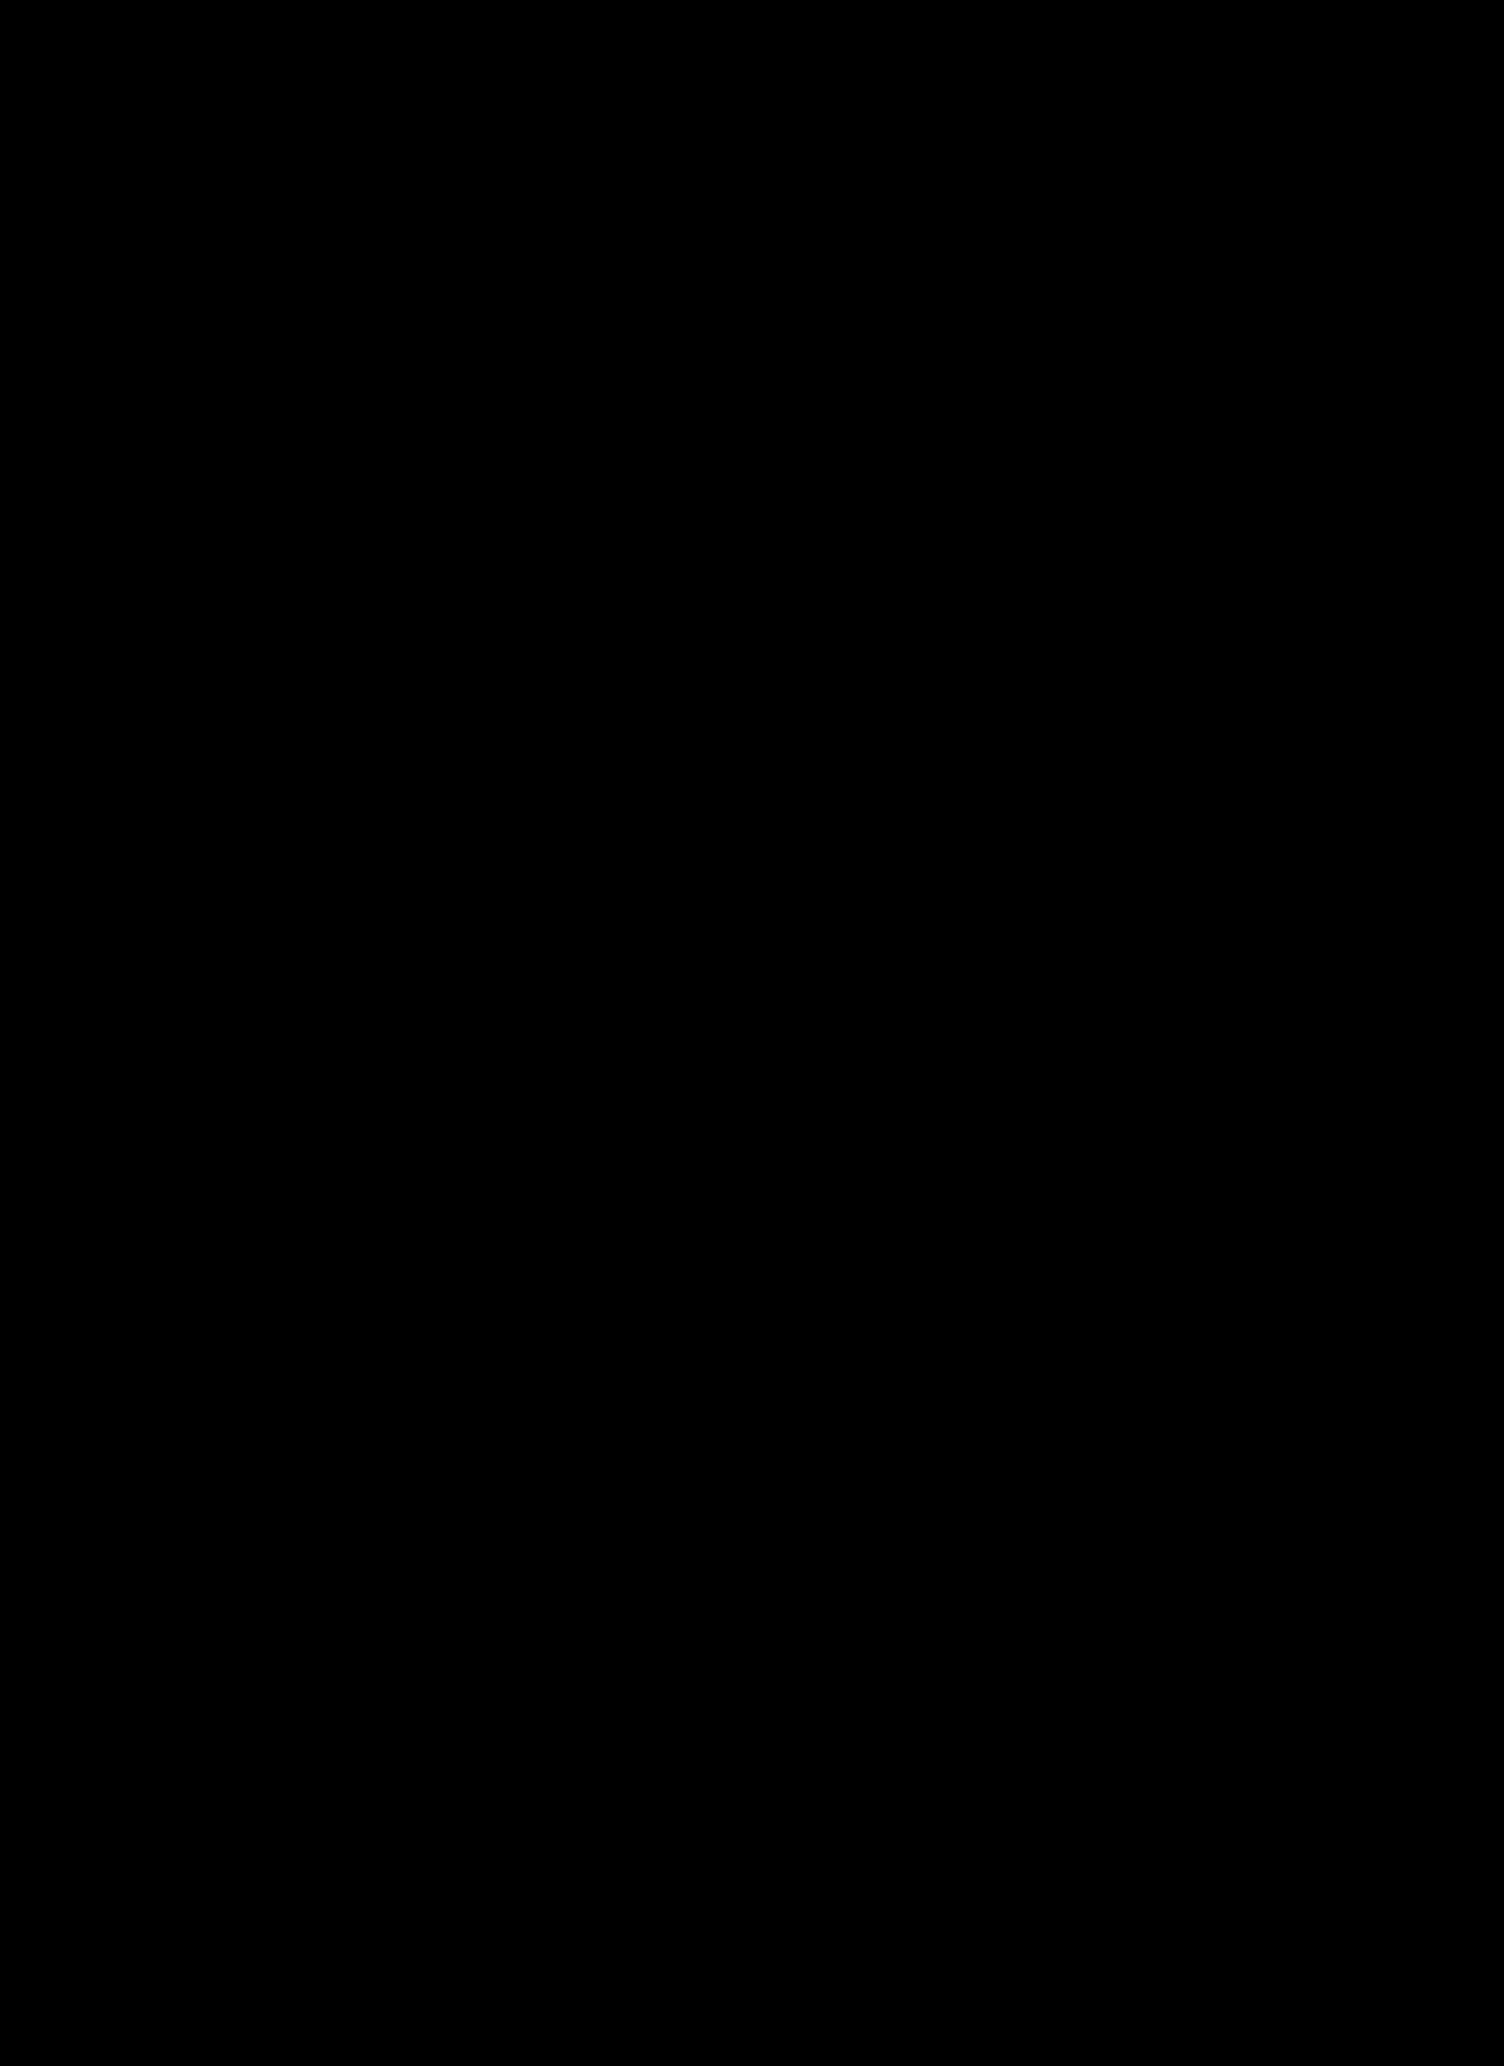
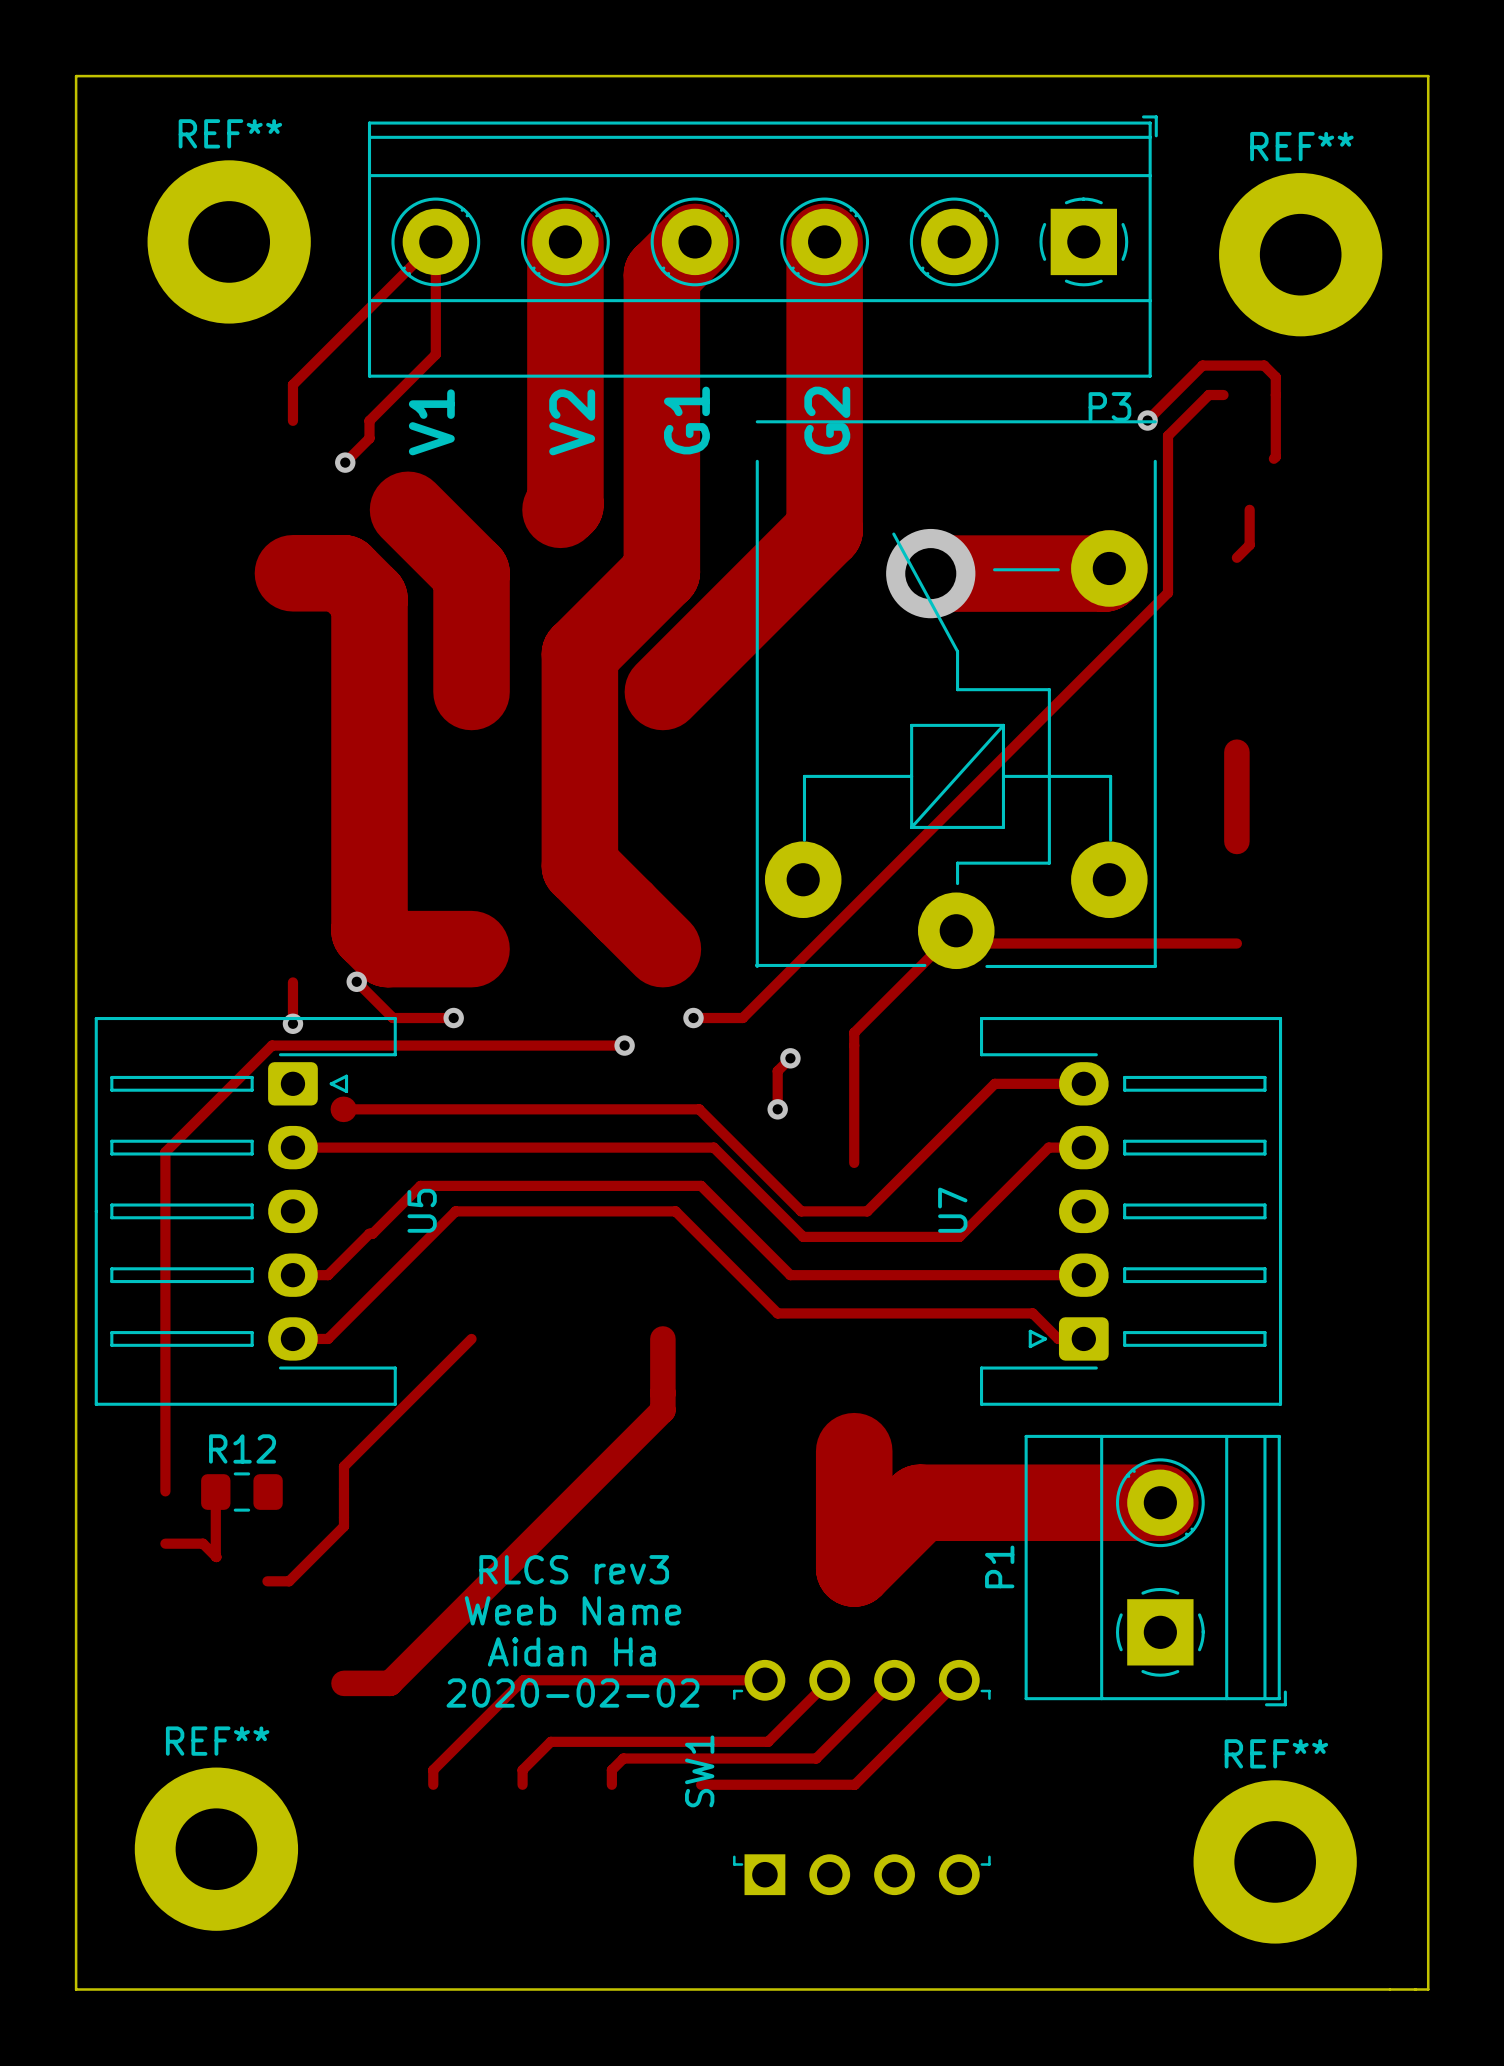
board edge: none -> (76, 76) (76, 1989) (1428, 1989) (1428, 76) (76, 76)
REF**: none -> (229, 241)
track: none -> (565, 241) (565, 504) (560, 509)
track: none -> (695, 241) (661, 275) (661, 572) (579, 654) (579, 866) (662, 949)
track: none -> (824, 241) (824, 530) (662, 691)
P3: none -> (762, 246)
REF**: none -> (1300, 254)
track: none -> (1223, 395) (1208, 395) (1168, 435) (1168, 592) (742, 1018) (693, 1018)
track: none -> (292, 420) (292, 384) (435, 241) (435, 354) (369, 420) (369, 438) (345, 462)
text: none -> G1 (686, 420)
text: none -> G2 (827, 420)
track: none -> (1147, 420) (1202, 365) (1264, 365) (1275, 377) (1275, 456) (1273, 458)
via: none -> (1147, 420)
text: none -> V1 (431, 422)
text: none -> V2 (572, 422)
via: none -> (345, 462)
track: none -> (408, 509) (471, 573) (471, 691)
track: none -> (1249, 509) (1249, 545) (1236, 557)
track: none -> (1109, 568) (1104, 573) (930, 573)
track: none -> (292, 573) (343, 573) (369, 599) (369, 930) (387, 949) (471, 949)
via: none -> (930, 573)
part: none -> (955, 694)
track: none -> (1236, 752) (1236, 841)
track: none -> (1236, 943) (969, 943) (956, 930) (854, 1032) (854, 1162)
track: none -> (356, 981) (392, 1018) (453, 1018)
via: none -> (356, 981)
track: none -> (292, 982) (292, 1023)
via: none -> (453, 1018)
via: none -> (693, 1018)
via: none -> (292, 1023)
track: none -> (624, 1045) (272, 1045) (165, 1152) (165, 1491)
via: none -> (624, 1045)
track: none -> (790, 1058) (777, 1071) (777, 1109)
via: none -> (790, 1058)
track: none -> (1083, 1083) (994, 1083) (867, 1211) (801, 1211) (699, 1109) (343, 1109)
via: none -> (777, 1109)
track: none -> (292, 1147) (713, 1147) (803, 1236) (959, 1236) (1048, 1147) (1083, 1147)
U5: none -> (245, 1211)
U7: none -> (1131, 1211)
track: none -> (292, 1275) (328, 1275) (420, 1185) (701, 1185) (790, 1275) (1083, 1275)
track: none -> (292, 1338) (328, 1338) (455, 1211) (675, 1211) (777, 1313) (1032, 1313) (1058, 1338) (1083, 1338)
track: none -> (471, 1338) (343, 1466) (343, 1526) (289, 1581) (267, 1581)
track: none -> (662, 1338) (662, 1410) (389, 1683) (343, 1683)
track: none -> (854, 1451) (854, 1568) (920, 1502) (1160, 1502)
track: none -> (215, 1492) (215, 1556)
R12: none -> (241, 1492)
track: none -> (165, 1543) (203, 1543) (216, 1557)
text: none -> RLCS rev3 (574, 1569)
P1: none -> (1155, 1570)
text: none -> Weeb Name (572, 1610)
text: none -> Aidan Ha (571, 1651)
track: none -> (764, 1680) (523, 1680) (433, 1770) (433, 1784)
track: none -> (829, 1680) (768, 1741) (550, 1741) (522, 1770) (522, 1784)
track: none -> (894, 1680) (816, 1758) (623, 1758) (611, 1770) (611, 1784)
track: none -> (959, 1680) (854, 1784) (701, 1784)
text: none -> 2020-02-02 (572, 1692)
SW1: none -> (861, 1777)
REF**: none -> (216, 1849)
REF**: none -> (1275, 1861)

